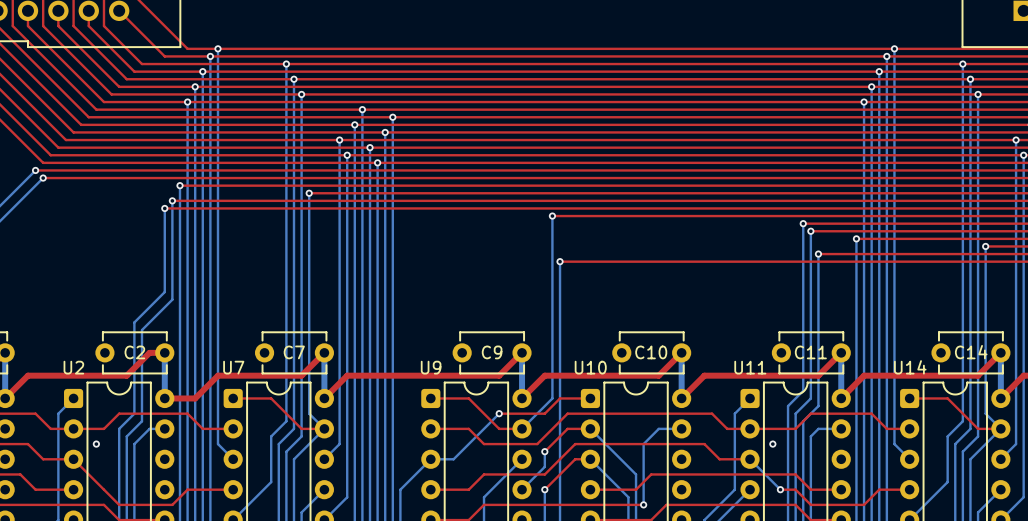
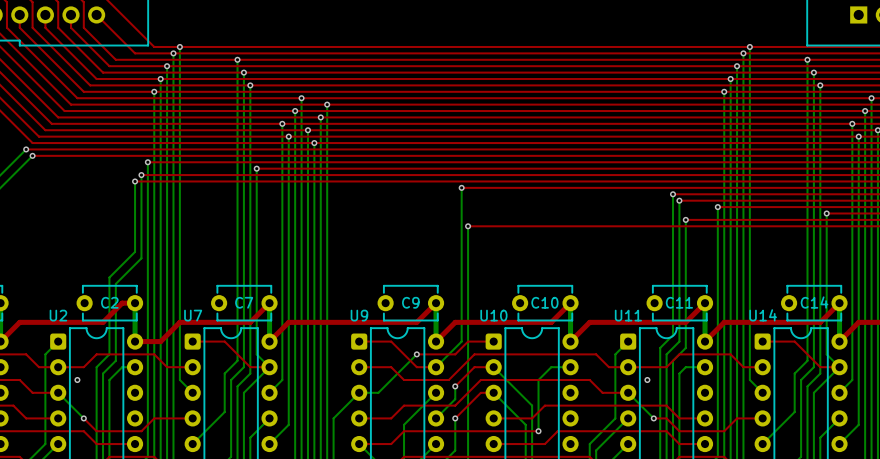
top track: (73, 459) (103, 489) -> none
bottom track: none -> (58, 392) (83, 418)
via: none -> (83, 418)

